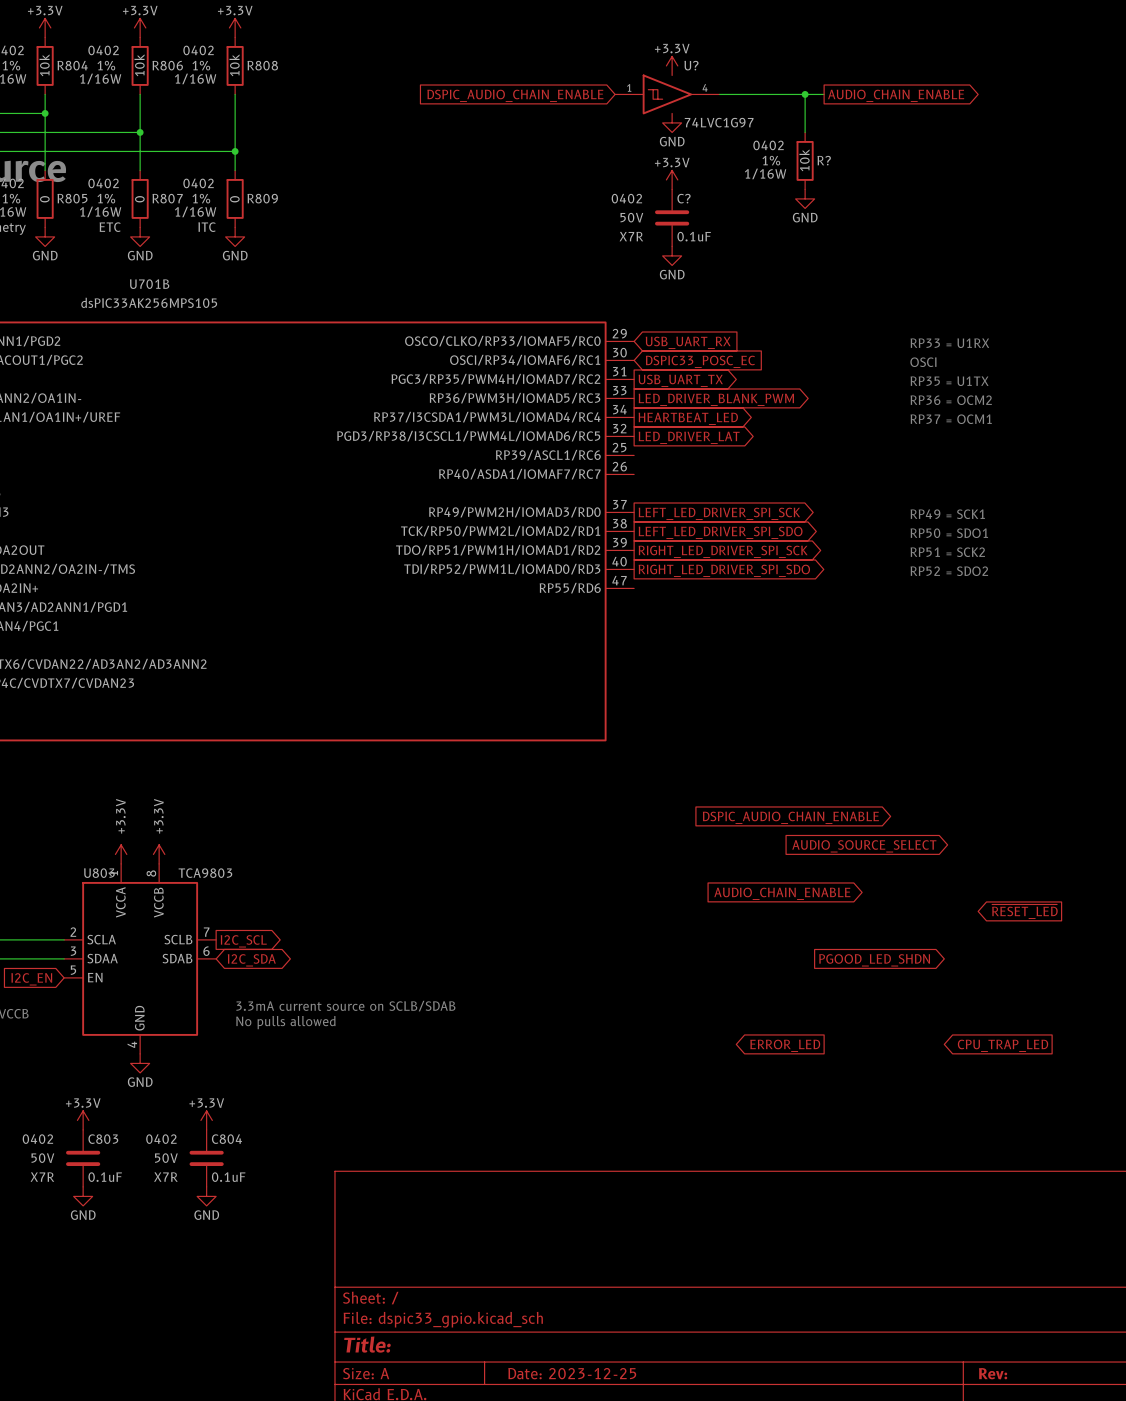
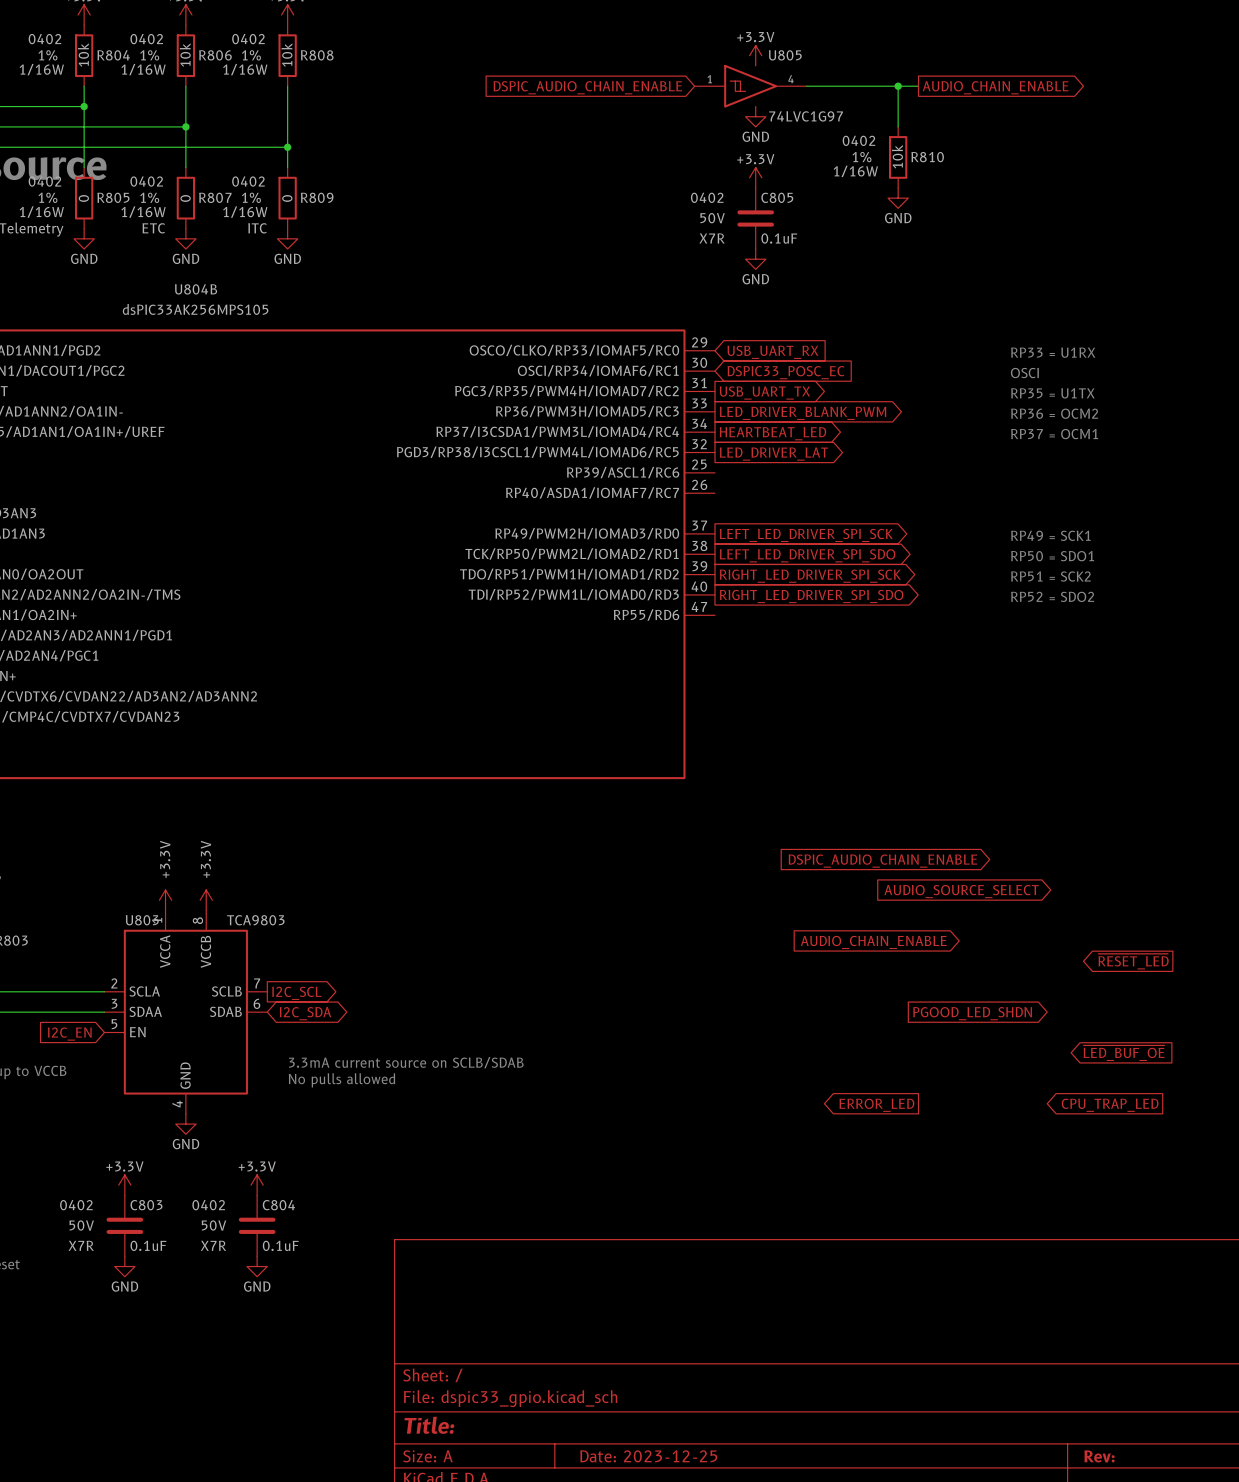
U? name: U? (691, 65) -> U805 (785, 55)
R? name: R? (824, 160) -> R810 (927, 157)
C? name: C? (684, 198) -> C805 (777, 197)
U701B name: U701B (149, 284) -> U804B (196, 289)
global label: none -> ~{LED_BUF_OE} (1124, 1053)

